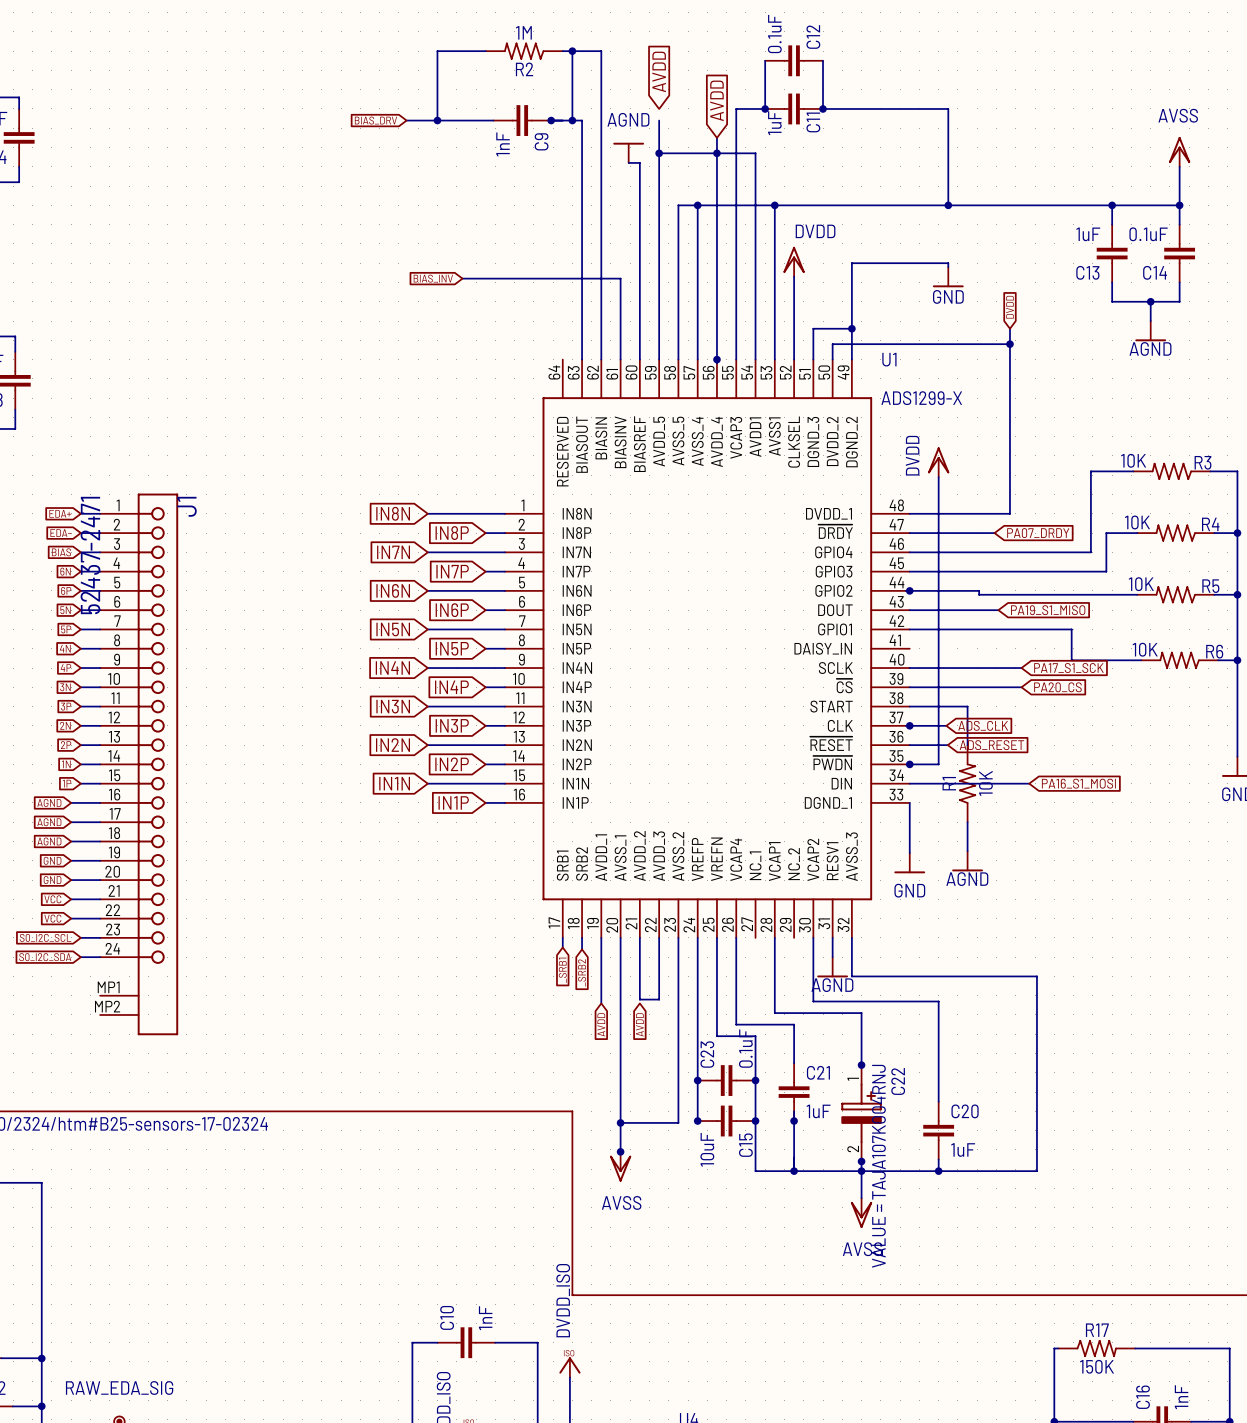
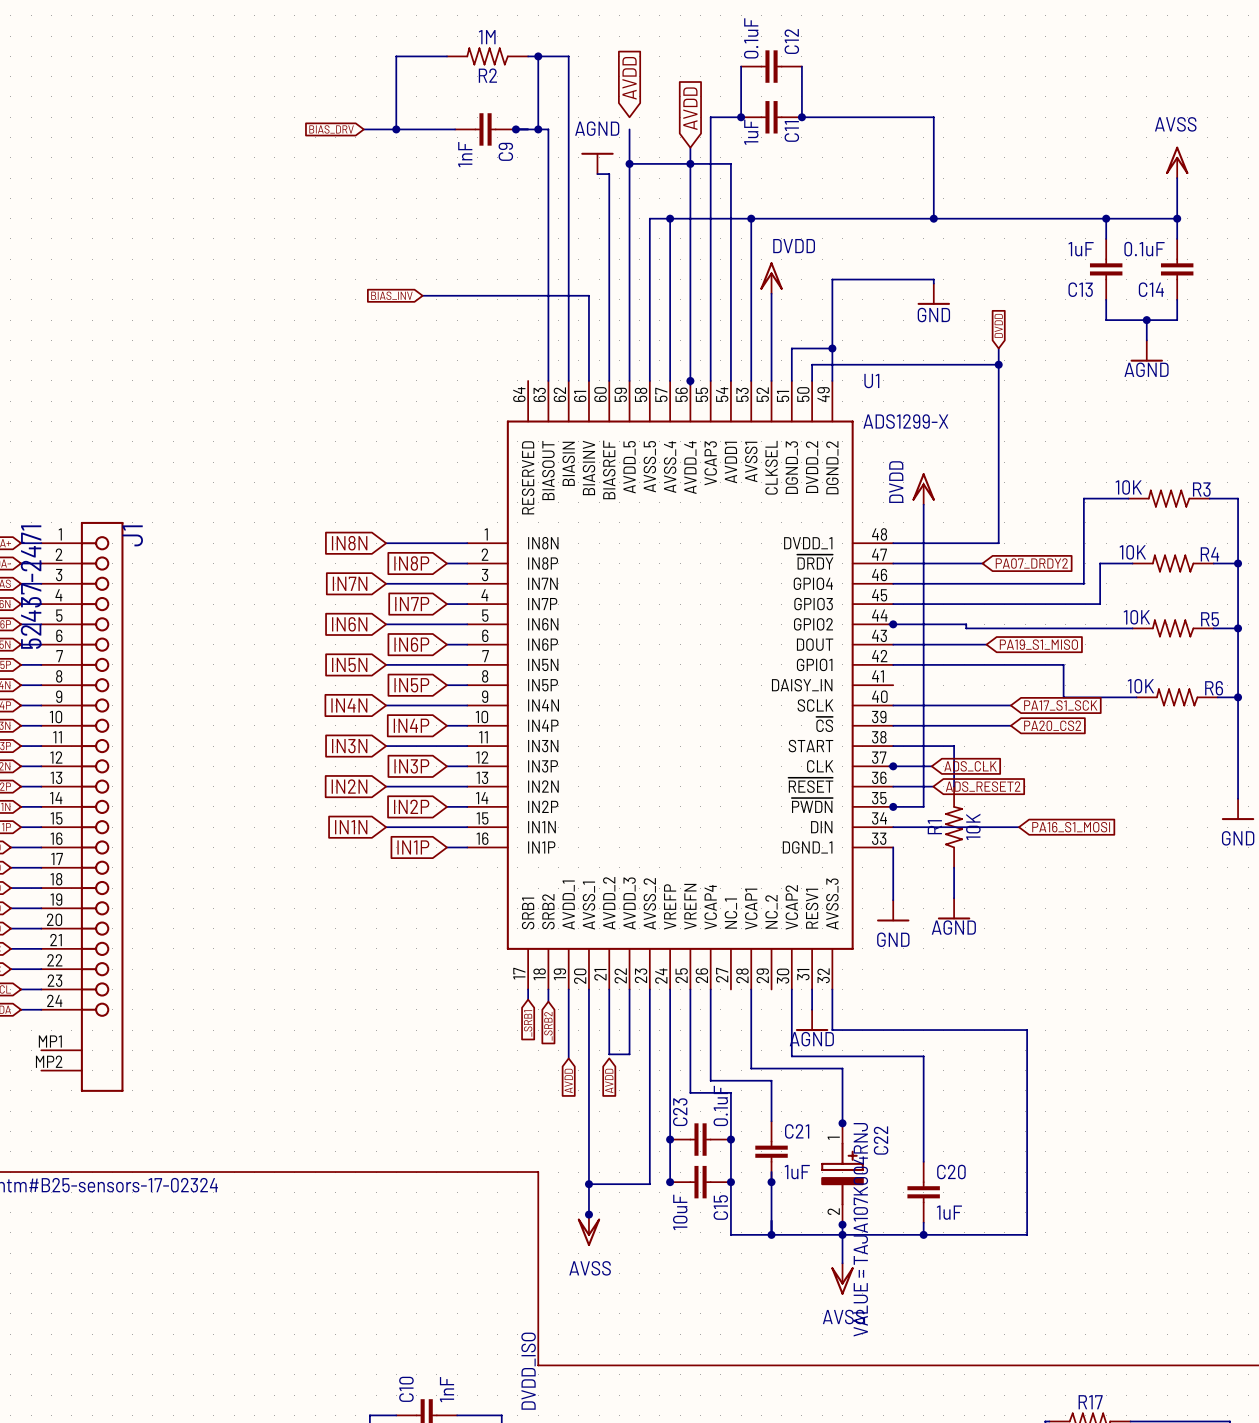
global label: PA07_DRDY (1038, 533) -> PA07_DRDY2 (1031, 563)
global label: PA20_CS (1057, 687) -> PA20_CS2 (1052, 725)
global label: ADS_RESET (991, 745) -> ADS_RESET2 (983, 786)

